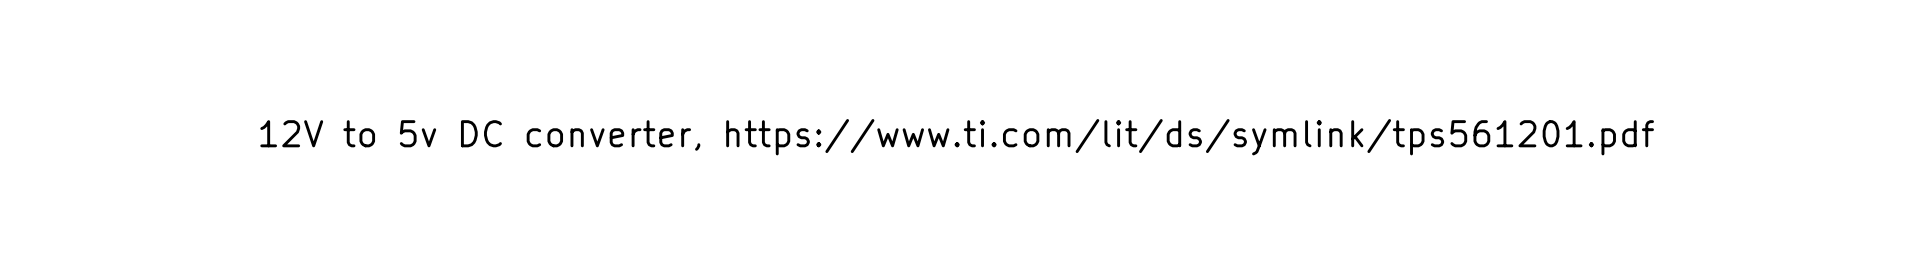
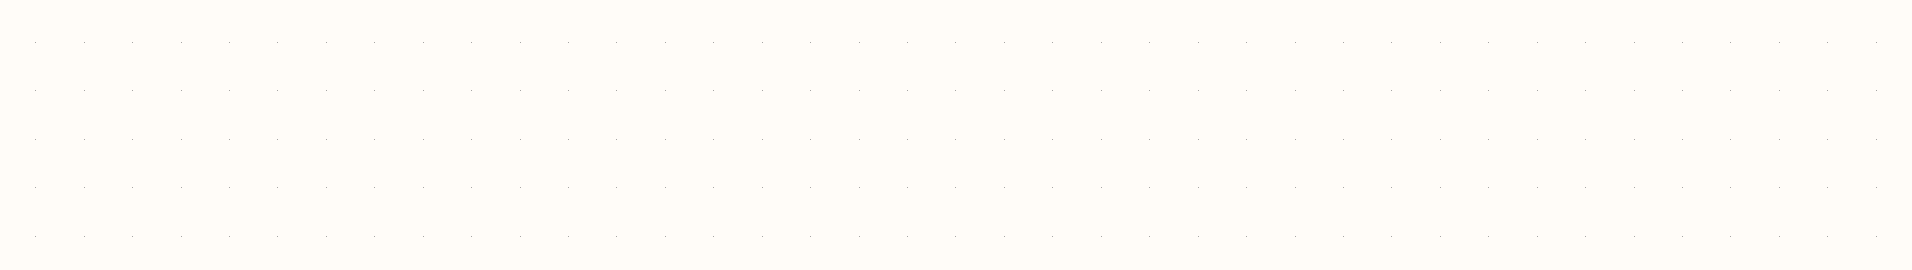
text: 12V to 5v DC converter, https://www.ti.com/lit/ds/symlink/tps561201.pdf (957, 137) -> none

